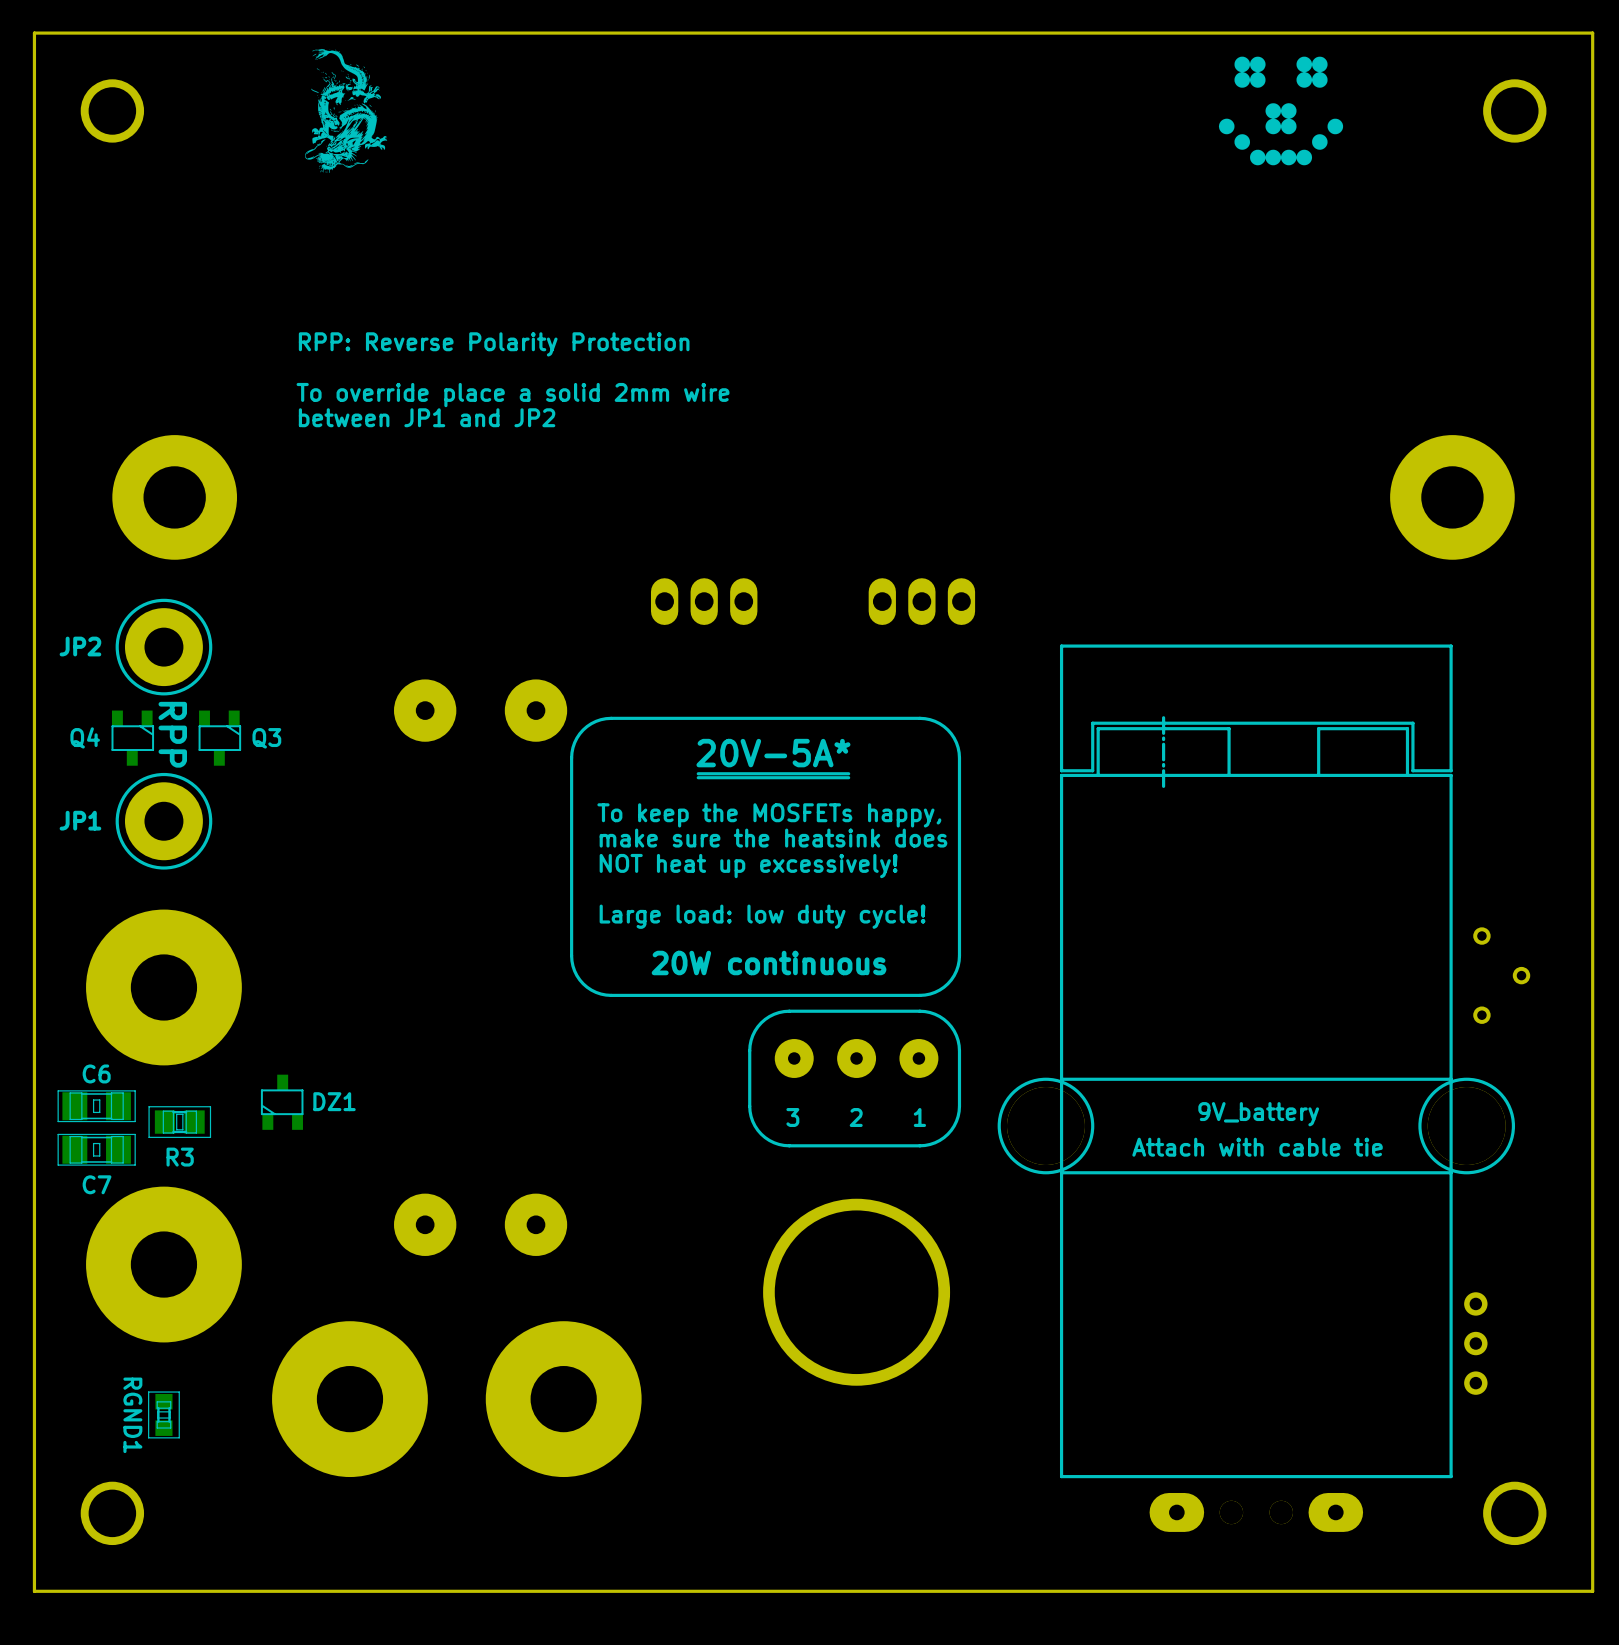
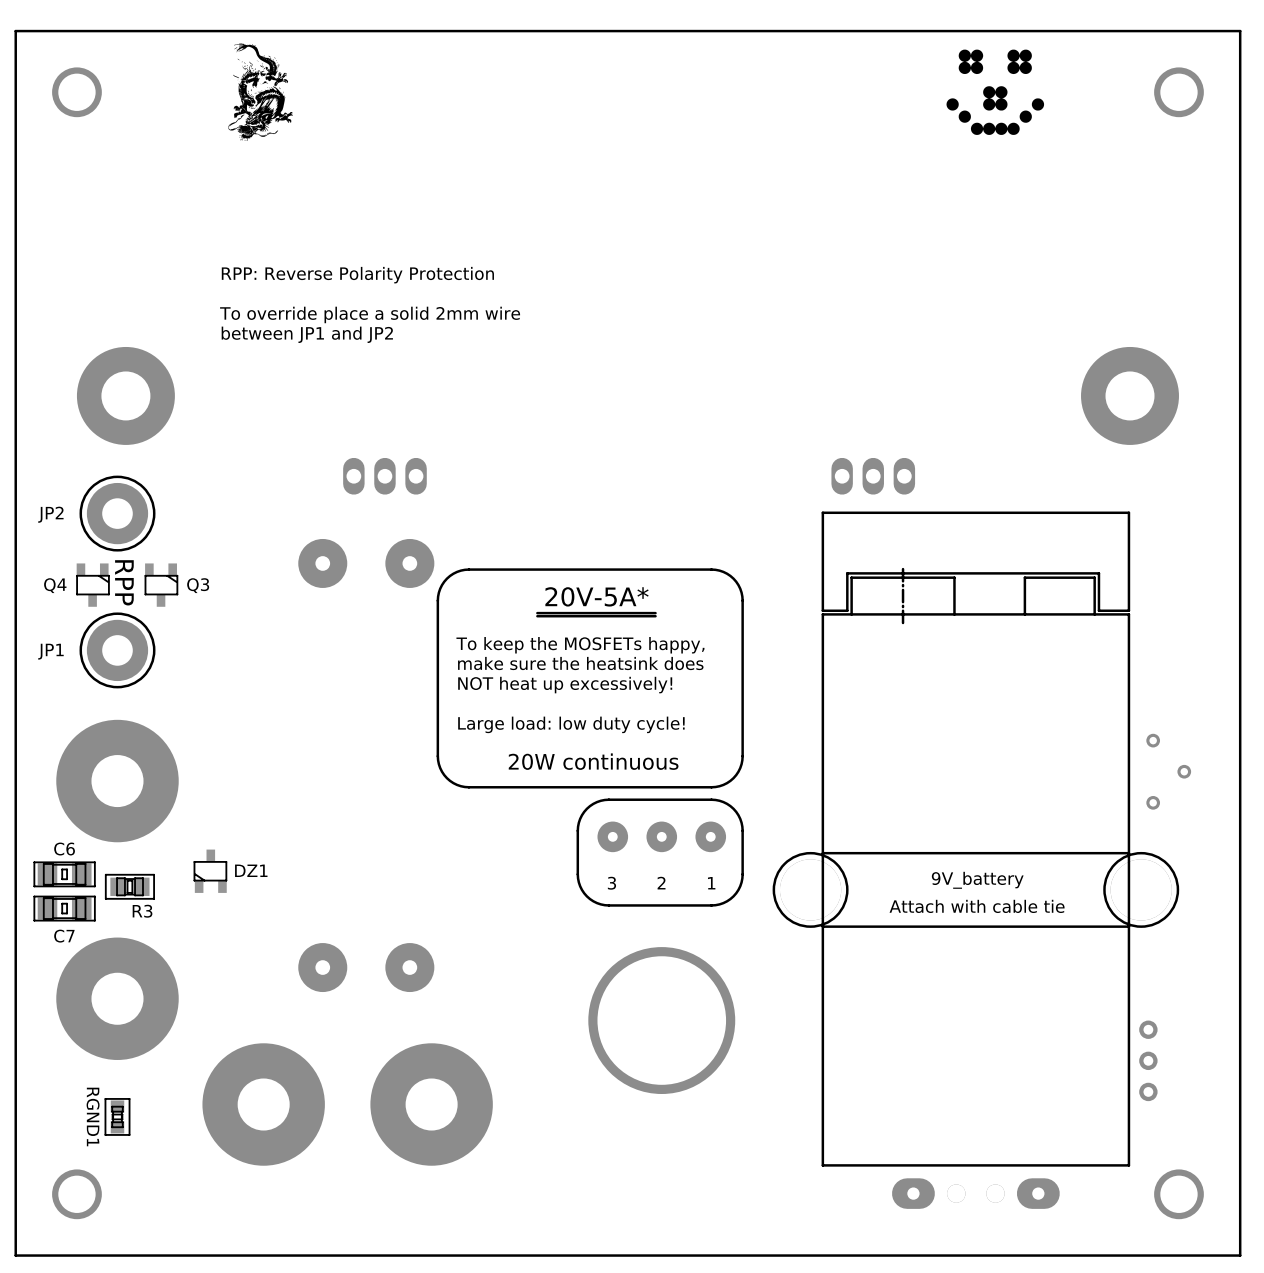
part position: (704, 601) -> (384, 476)
part position: (921, 601) -> (873, 476)
R3 name position: R3 (180, 1157) -> R3 (142, 911)

